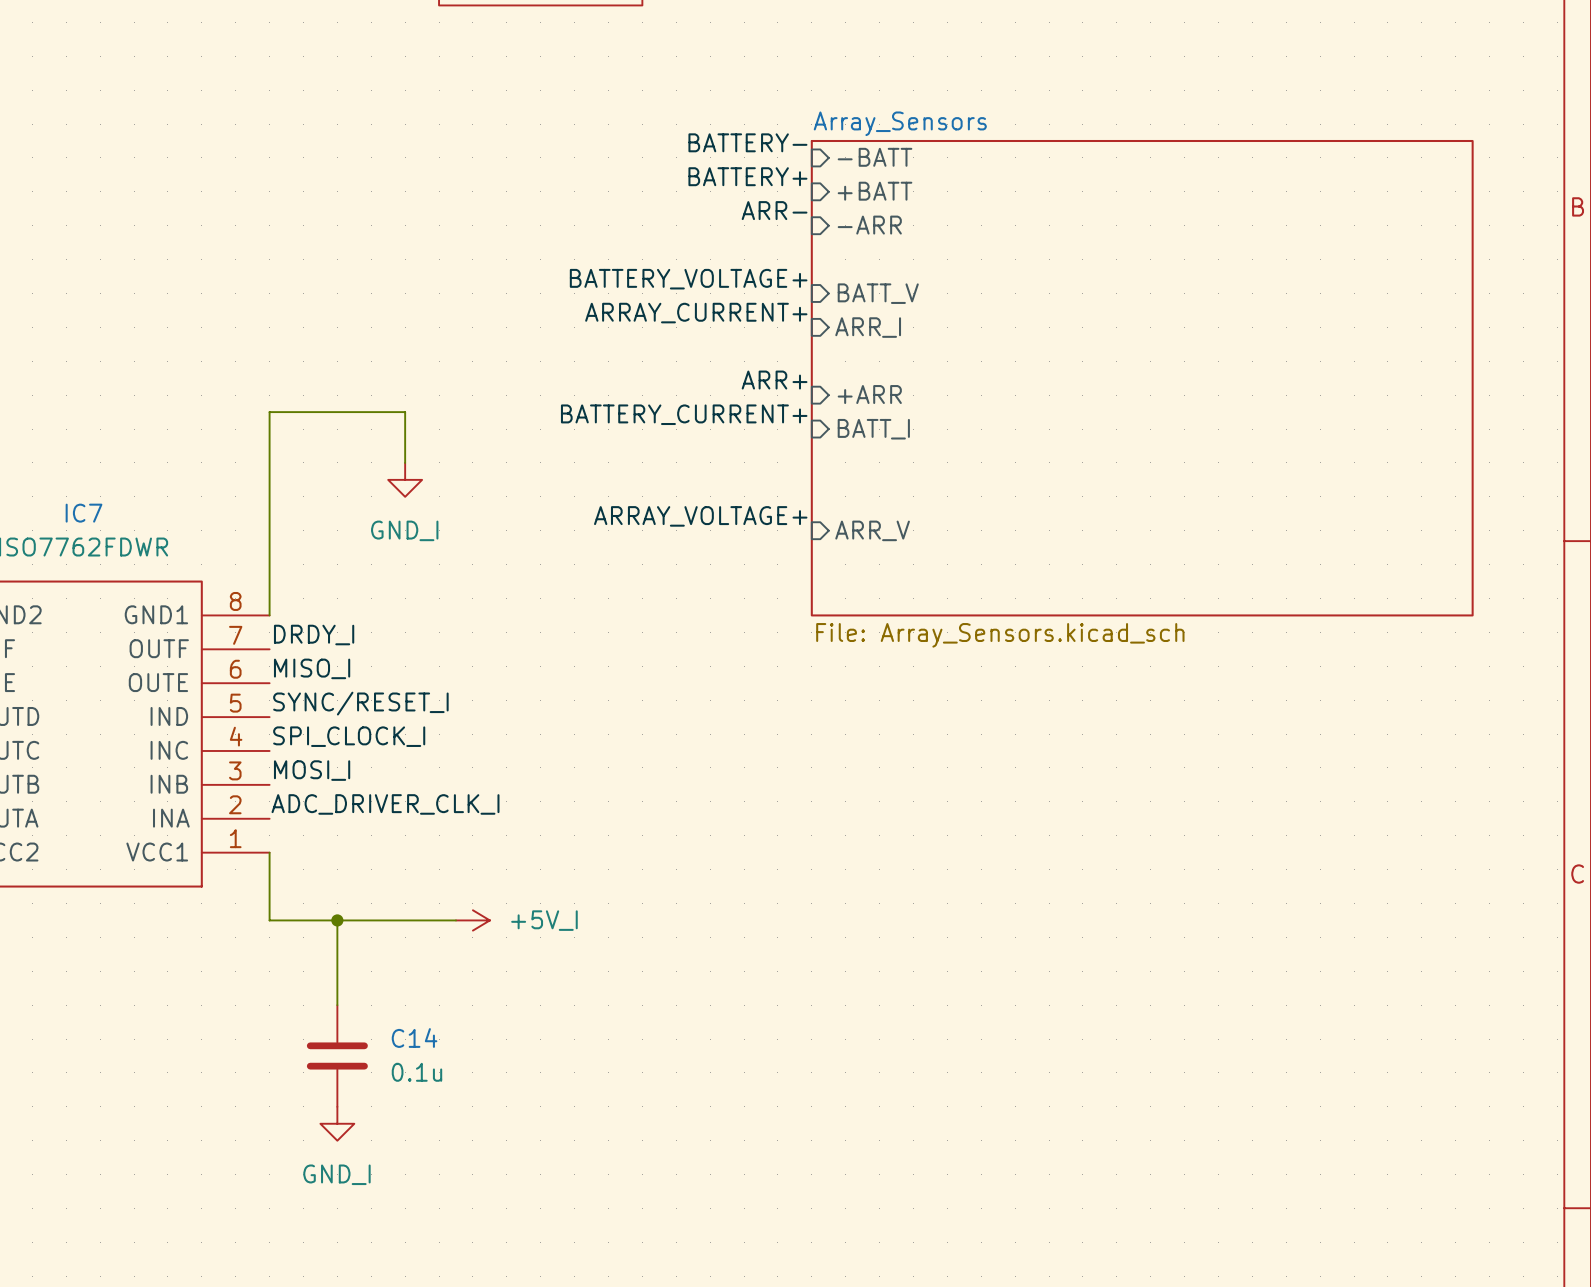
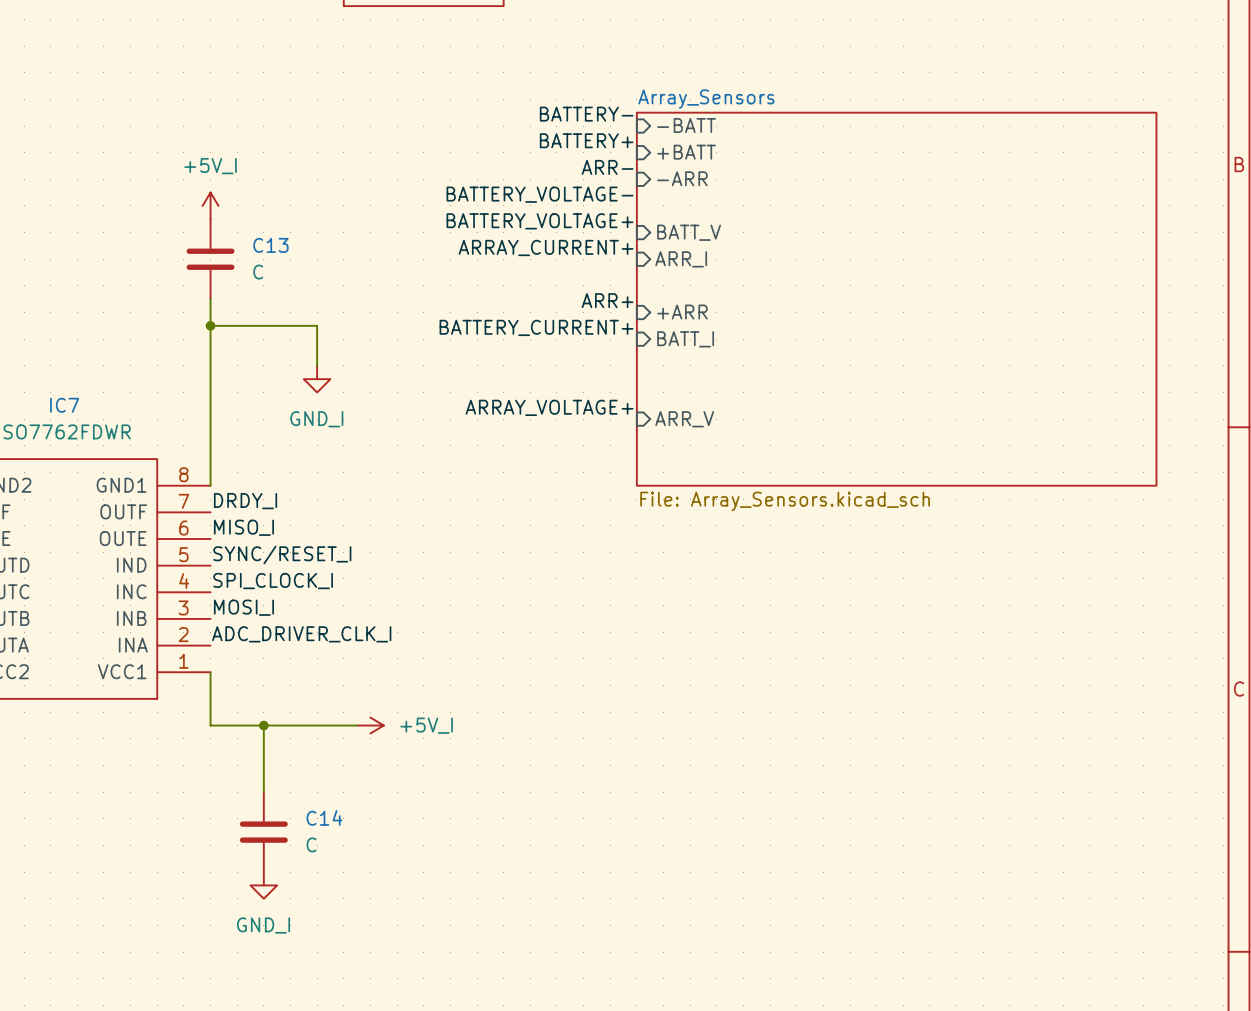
label: none -> BATTERY_VOLTAGE- (540, 194)
power symbol: none -> +5V_I (210, 205)
C13: none -> C (210, 259)
wire: none -> (210, 299) (210, 325)
junction: none -> (210, 325)
C14 value: 0.1u (416, 1072) -> C (311, 844)

